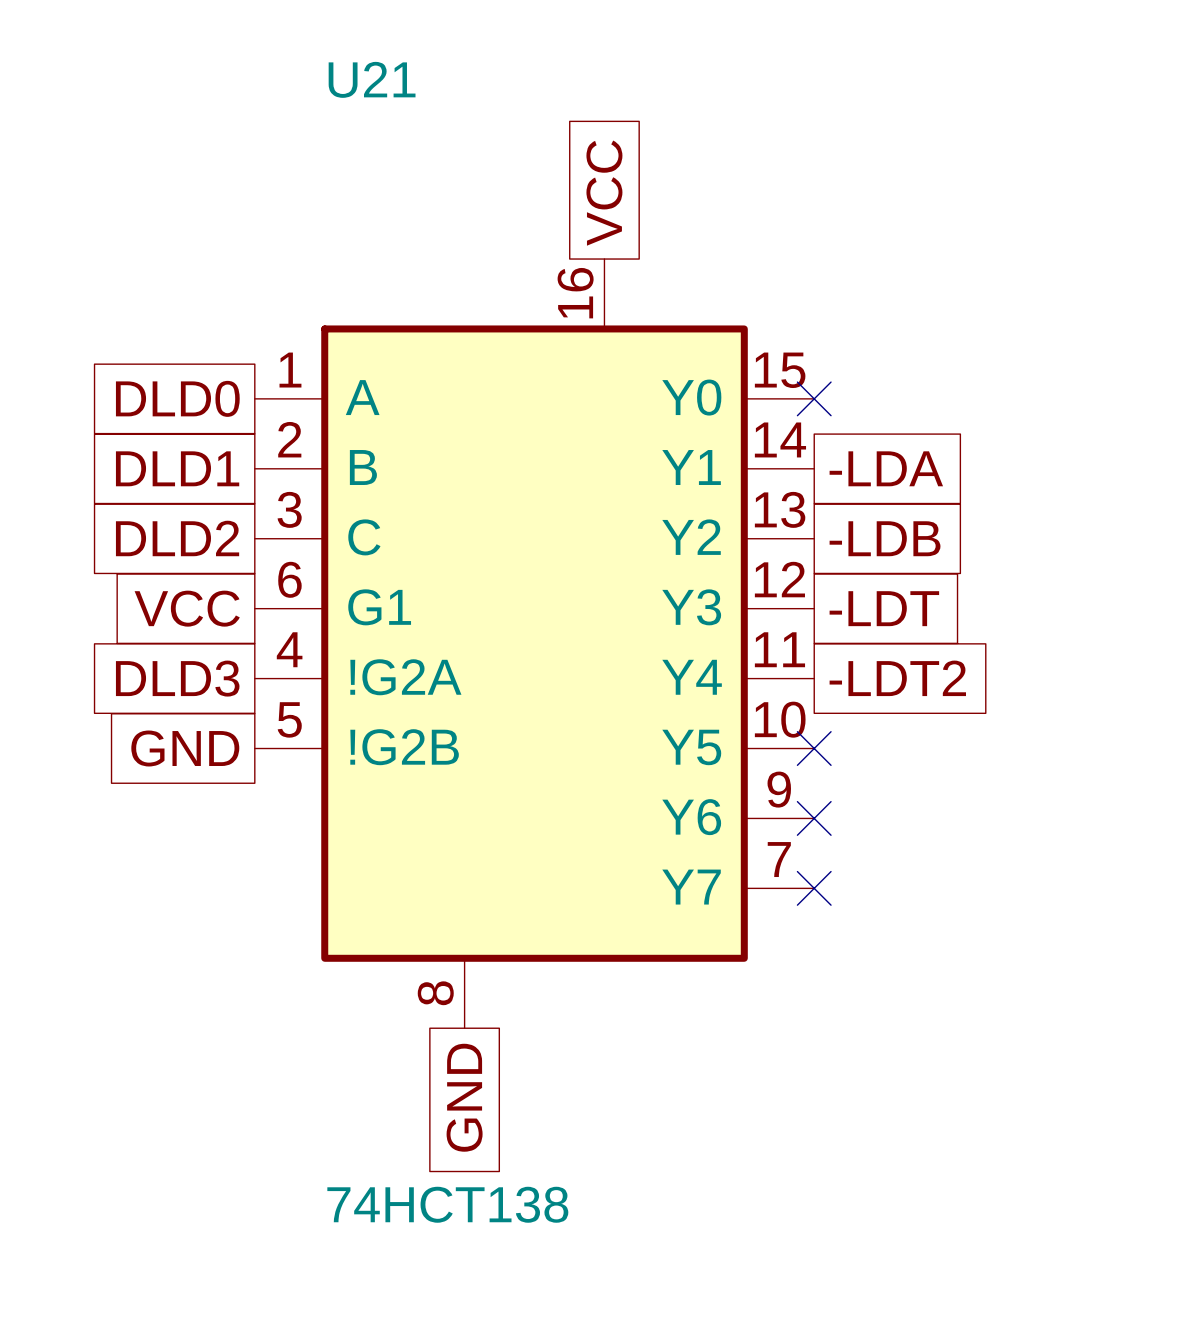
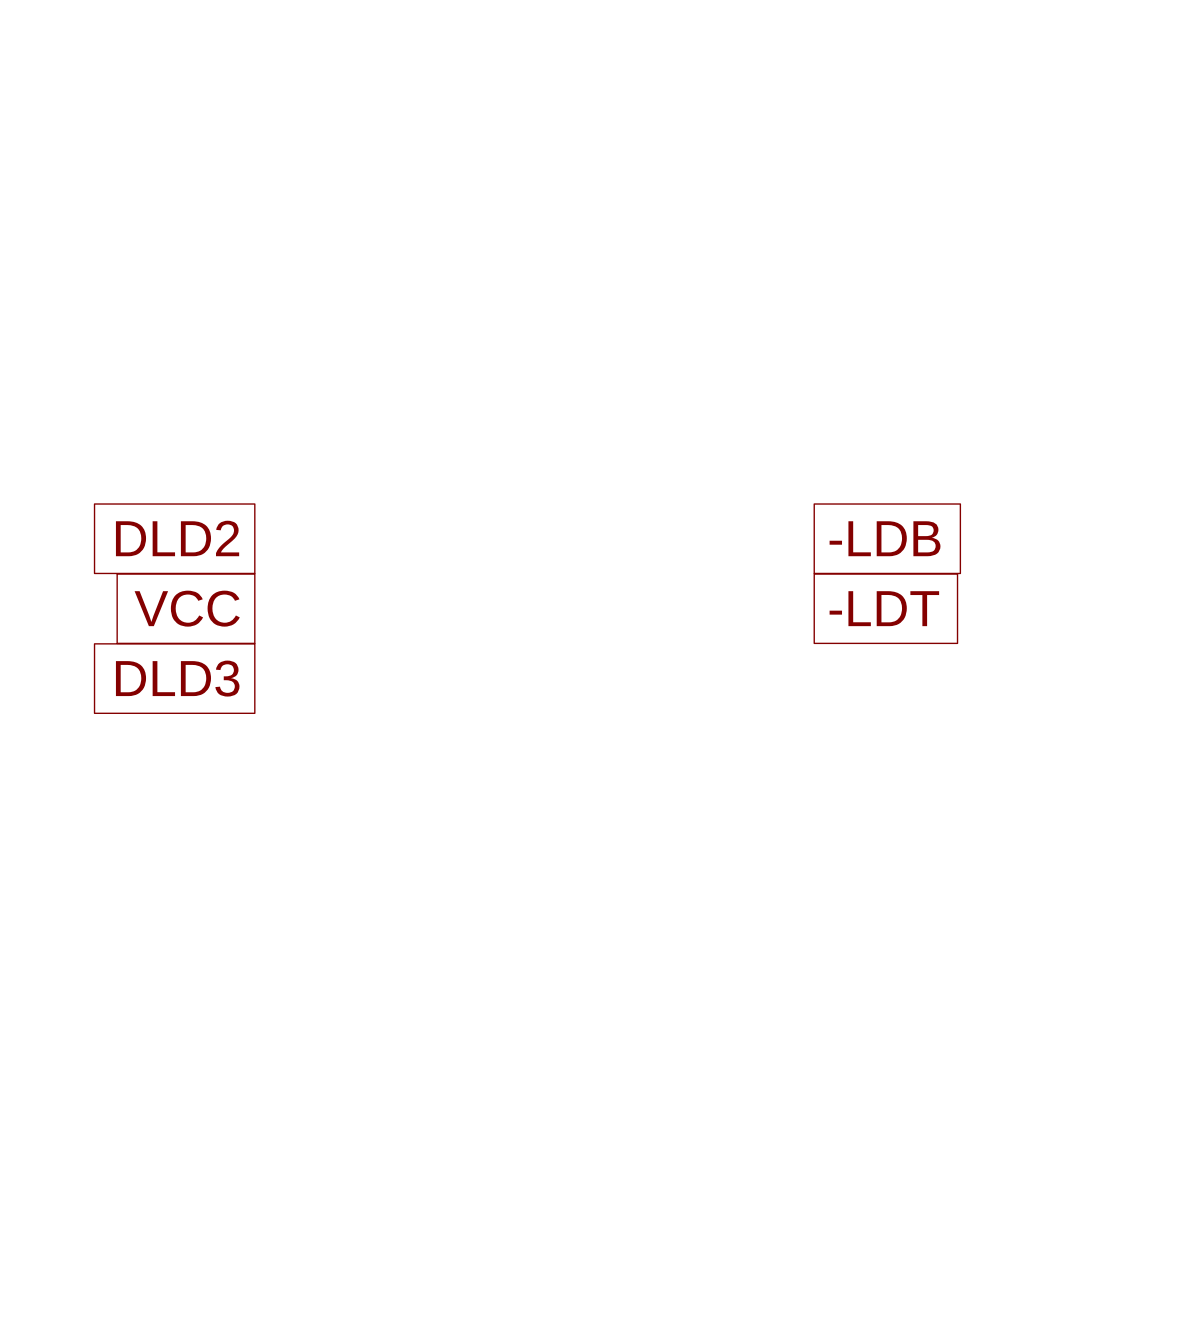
global label: VCC (604, 193) -> none
global label: DLD0 (177, 398) -> none
no-connect mark: (814, 398) -> none
global label: DLD1 (177, 468) -> none
global label: -LDA (886, 468) -> none
U21: 74HCT138 (534, 643) -> none
global label: -LDT2 (897, 678) -> none
global label: GND (185, 748) -> none
no-connect mark: (814, 748) -> none
no-connect mark: (814, 818) -> none
no-connect mark: (814, 888) -> none
global label: GND (464, 1097) -> none

